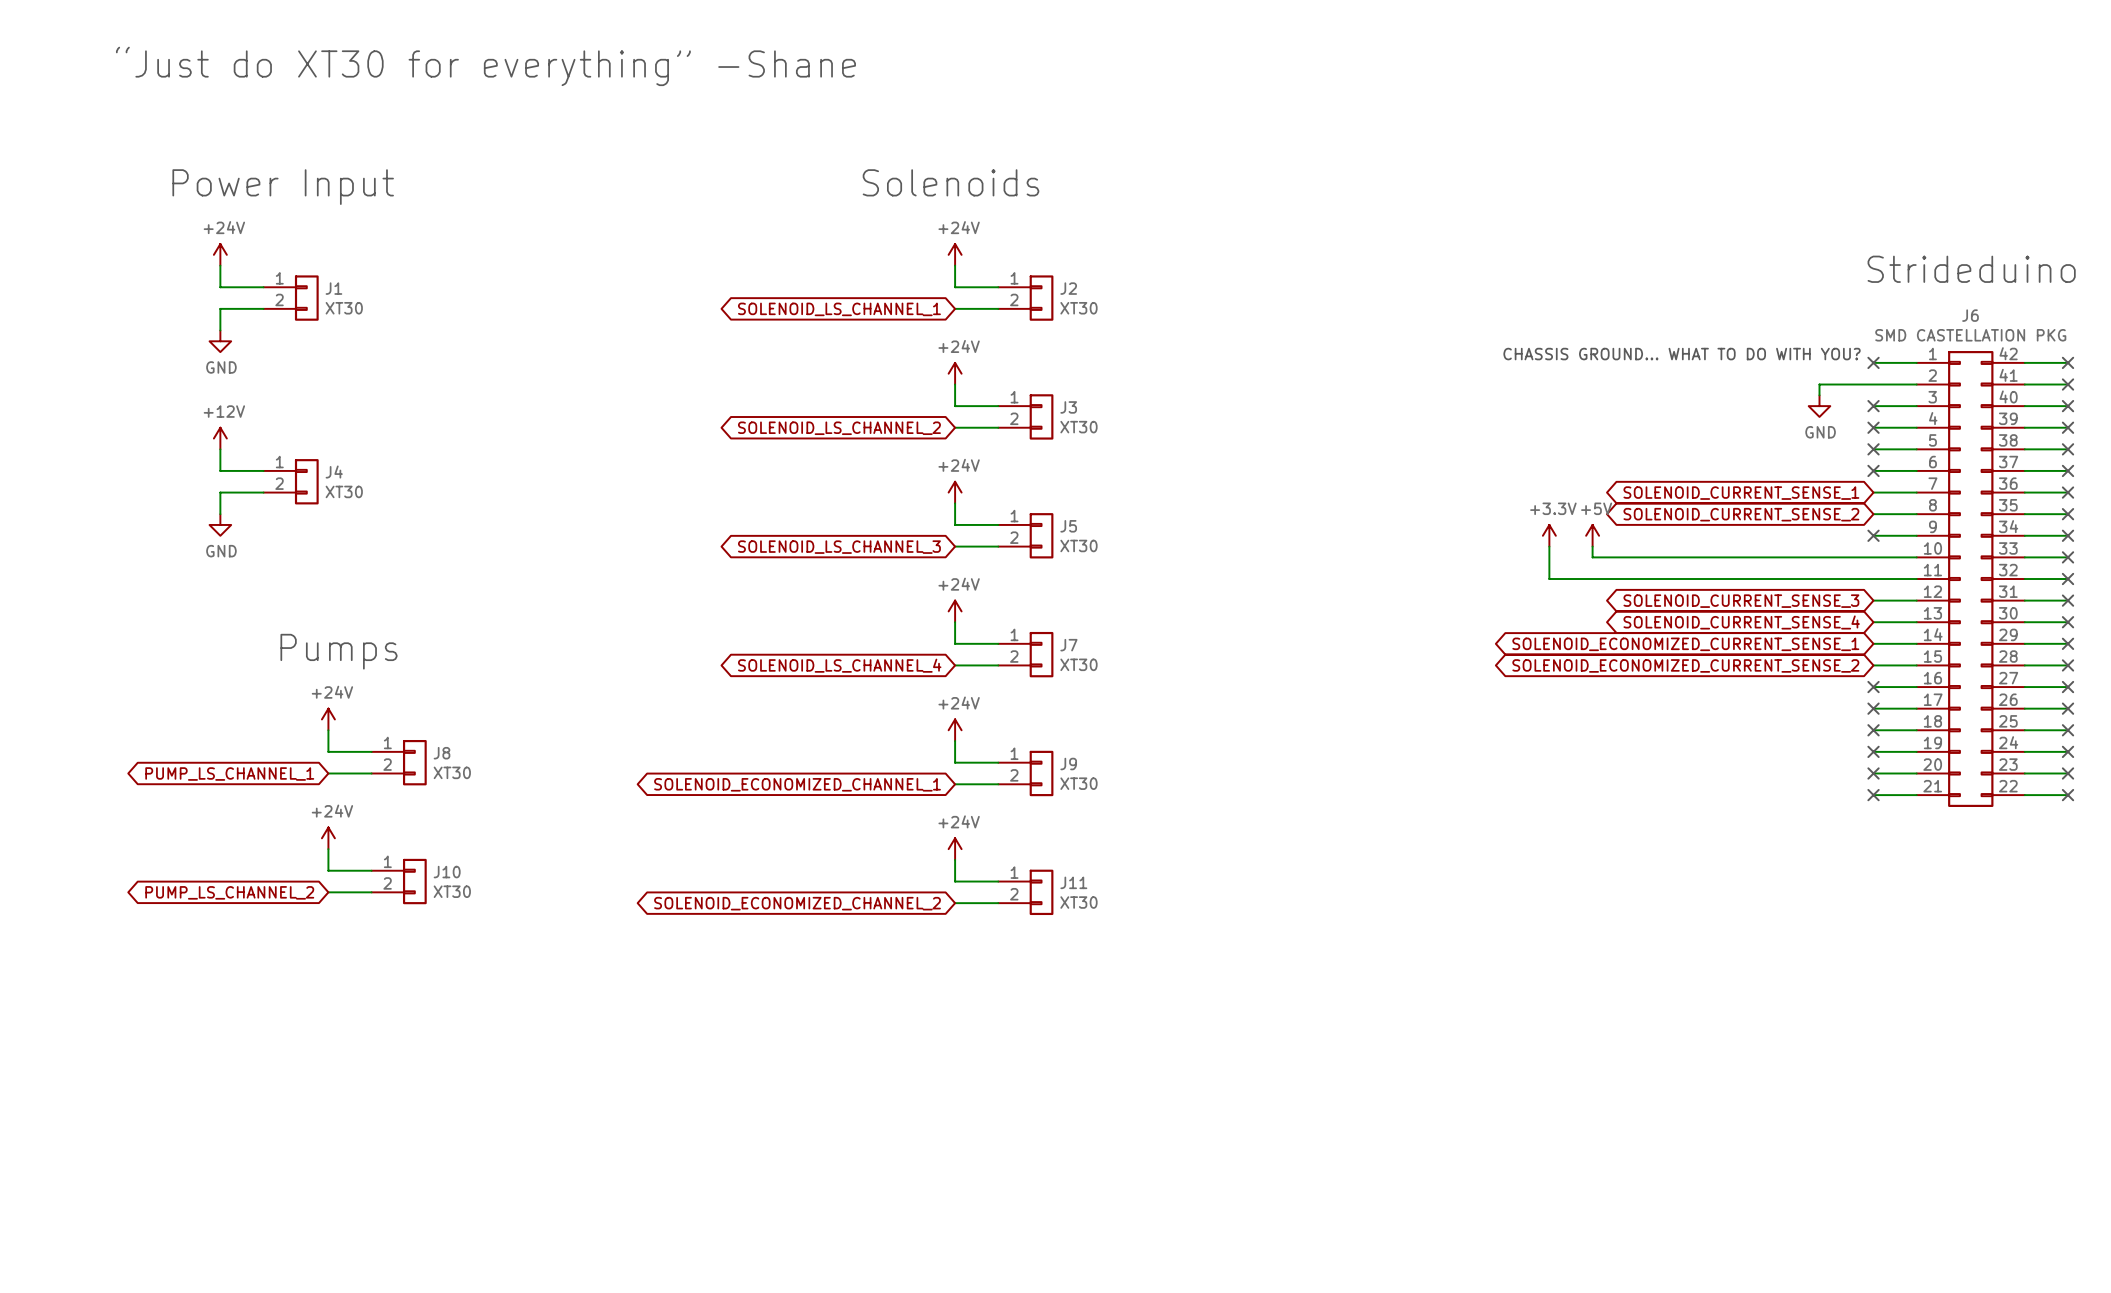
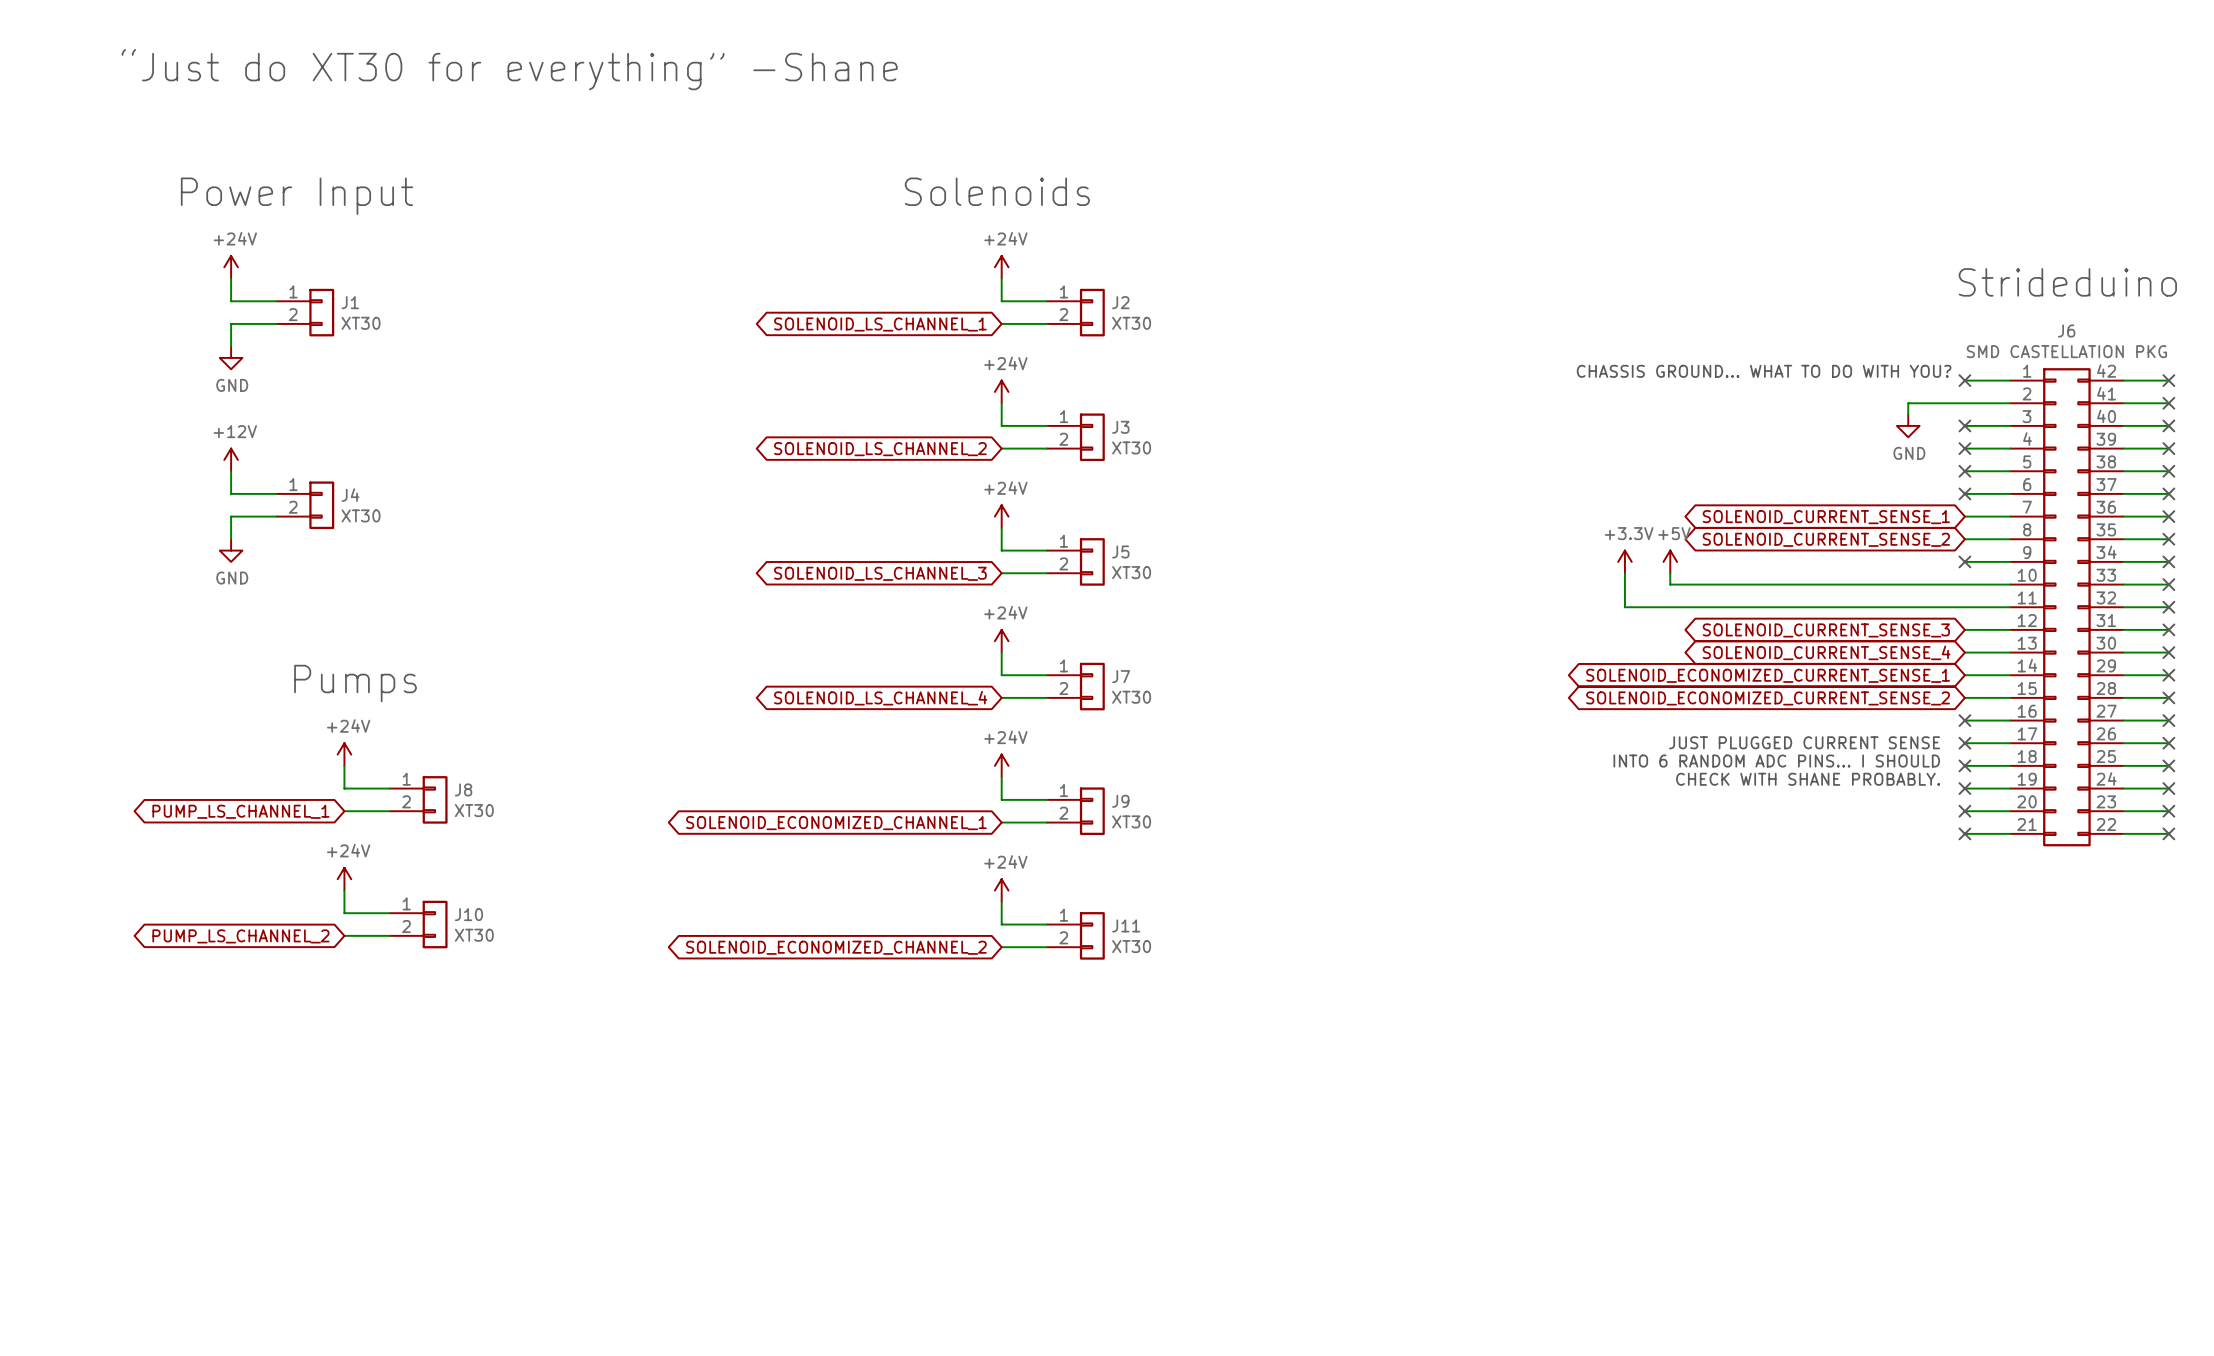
text: none -> JUST PLUGGED CURRENT SENSE (1804, 742)
text: none -> INTO 6 RANDOM ADC PINS… I SHOULD (1776, 761)
text: none -> CHECK WITH SHANE PROBABLY. (1808, 779)

